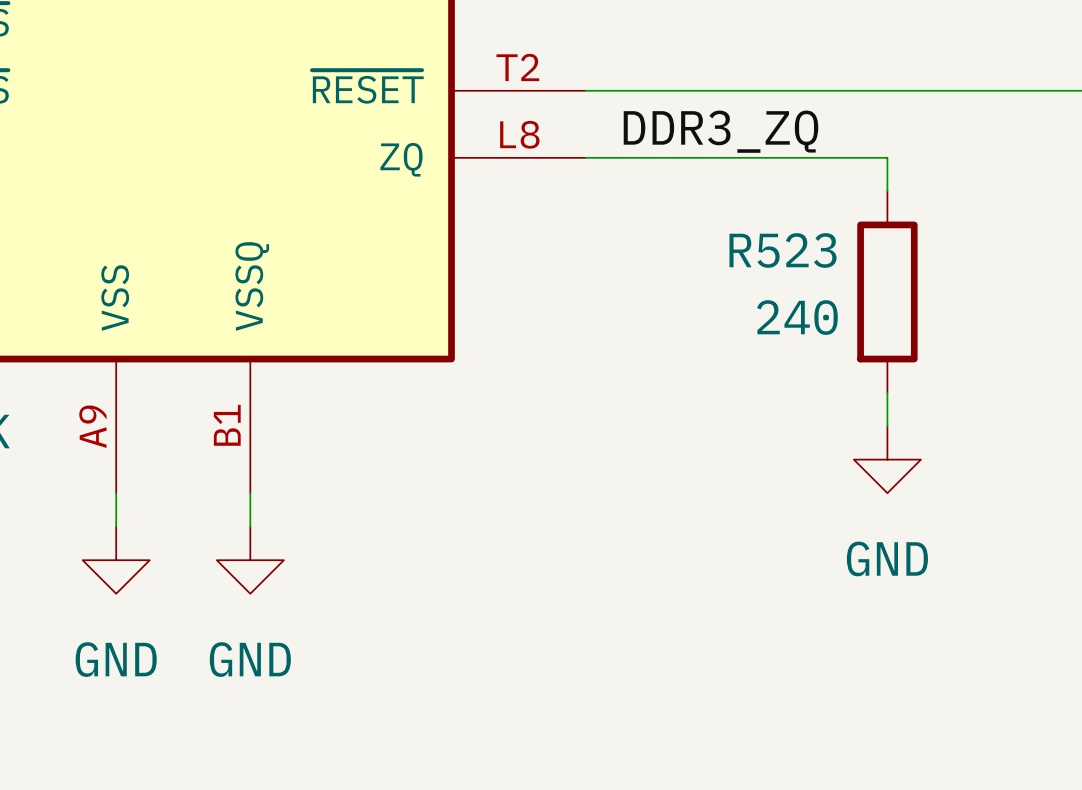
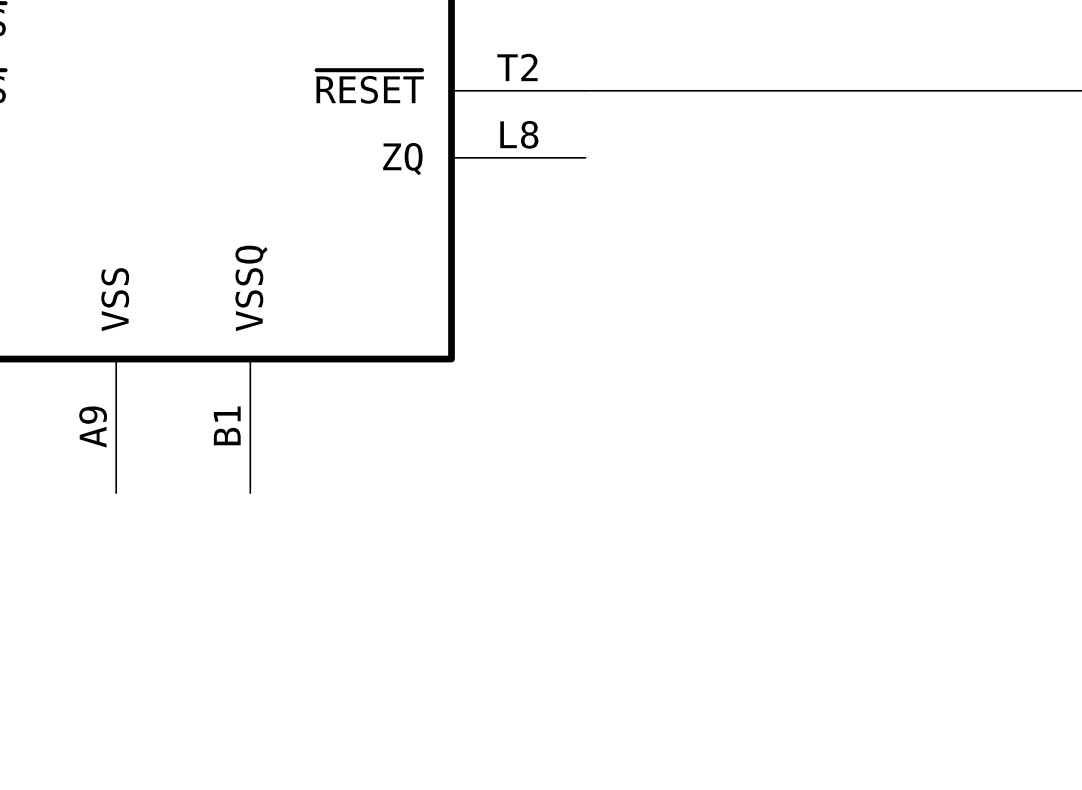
label: DDR3_ZQ (720, 131) -> none
wire: (585, 157) (887, 157) (887, 191) -> none
R523: 240 (887, 291) -> none
wire: (887, 392) (887, 426) -> none
power symbol: GND (887, 459) -> none
wire: (116, 493) (116, 526) -> none
wire: (250, 493) (250, 526) -> none
power symbol: GND (116, 560) -> none
power symbol: GND (250, 560) -> none

